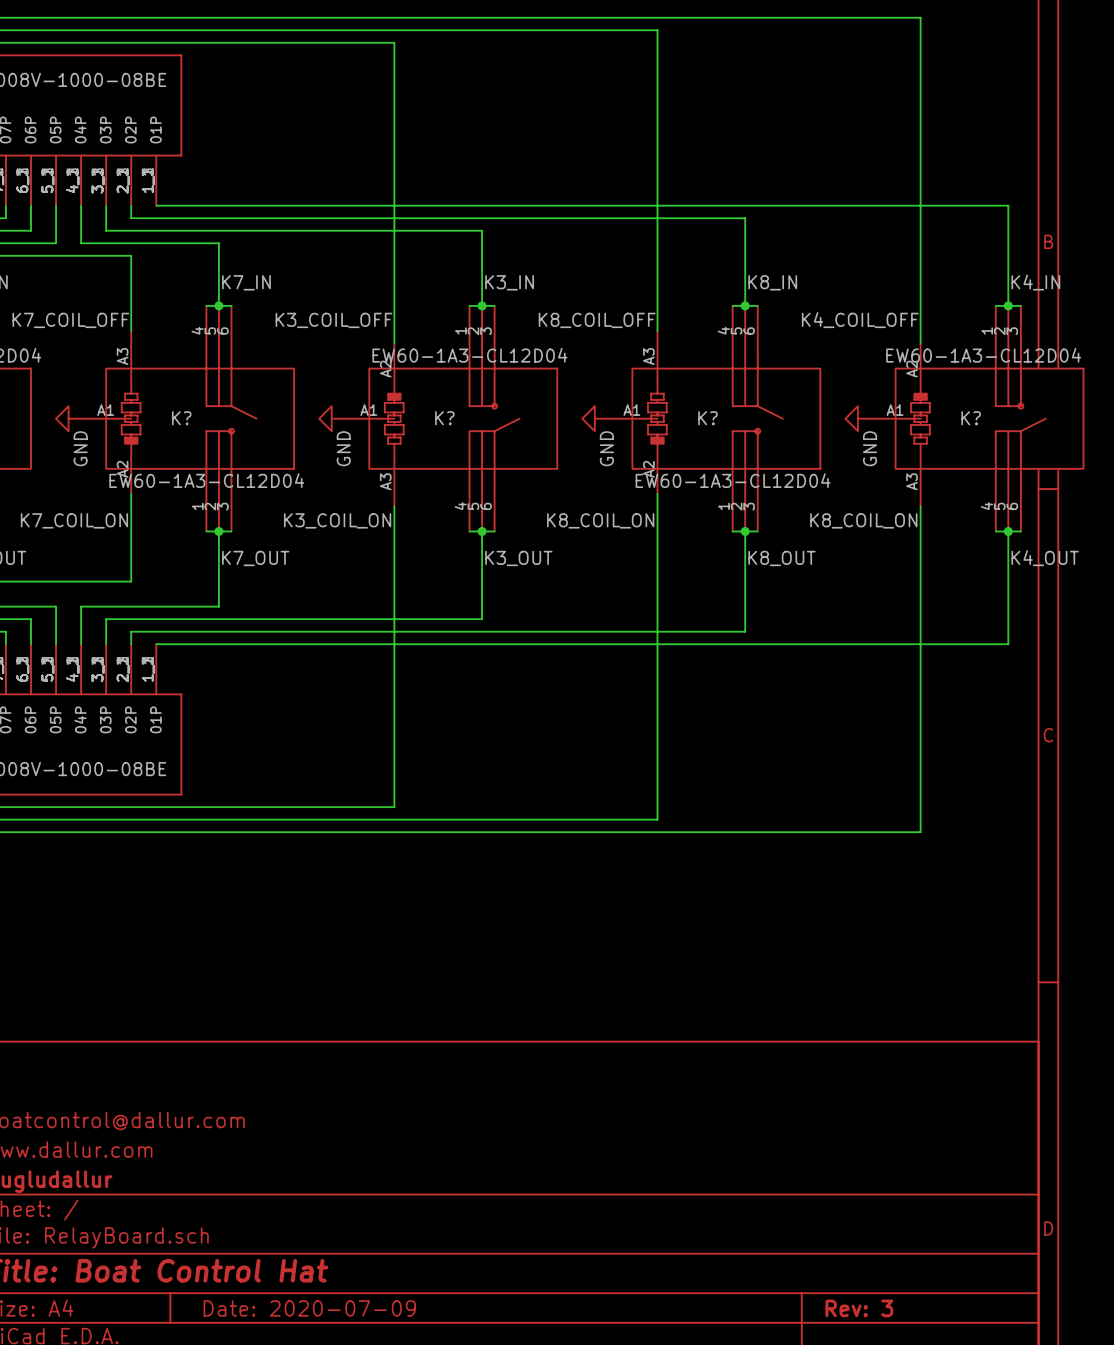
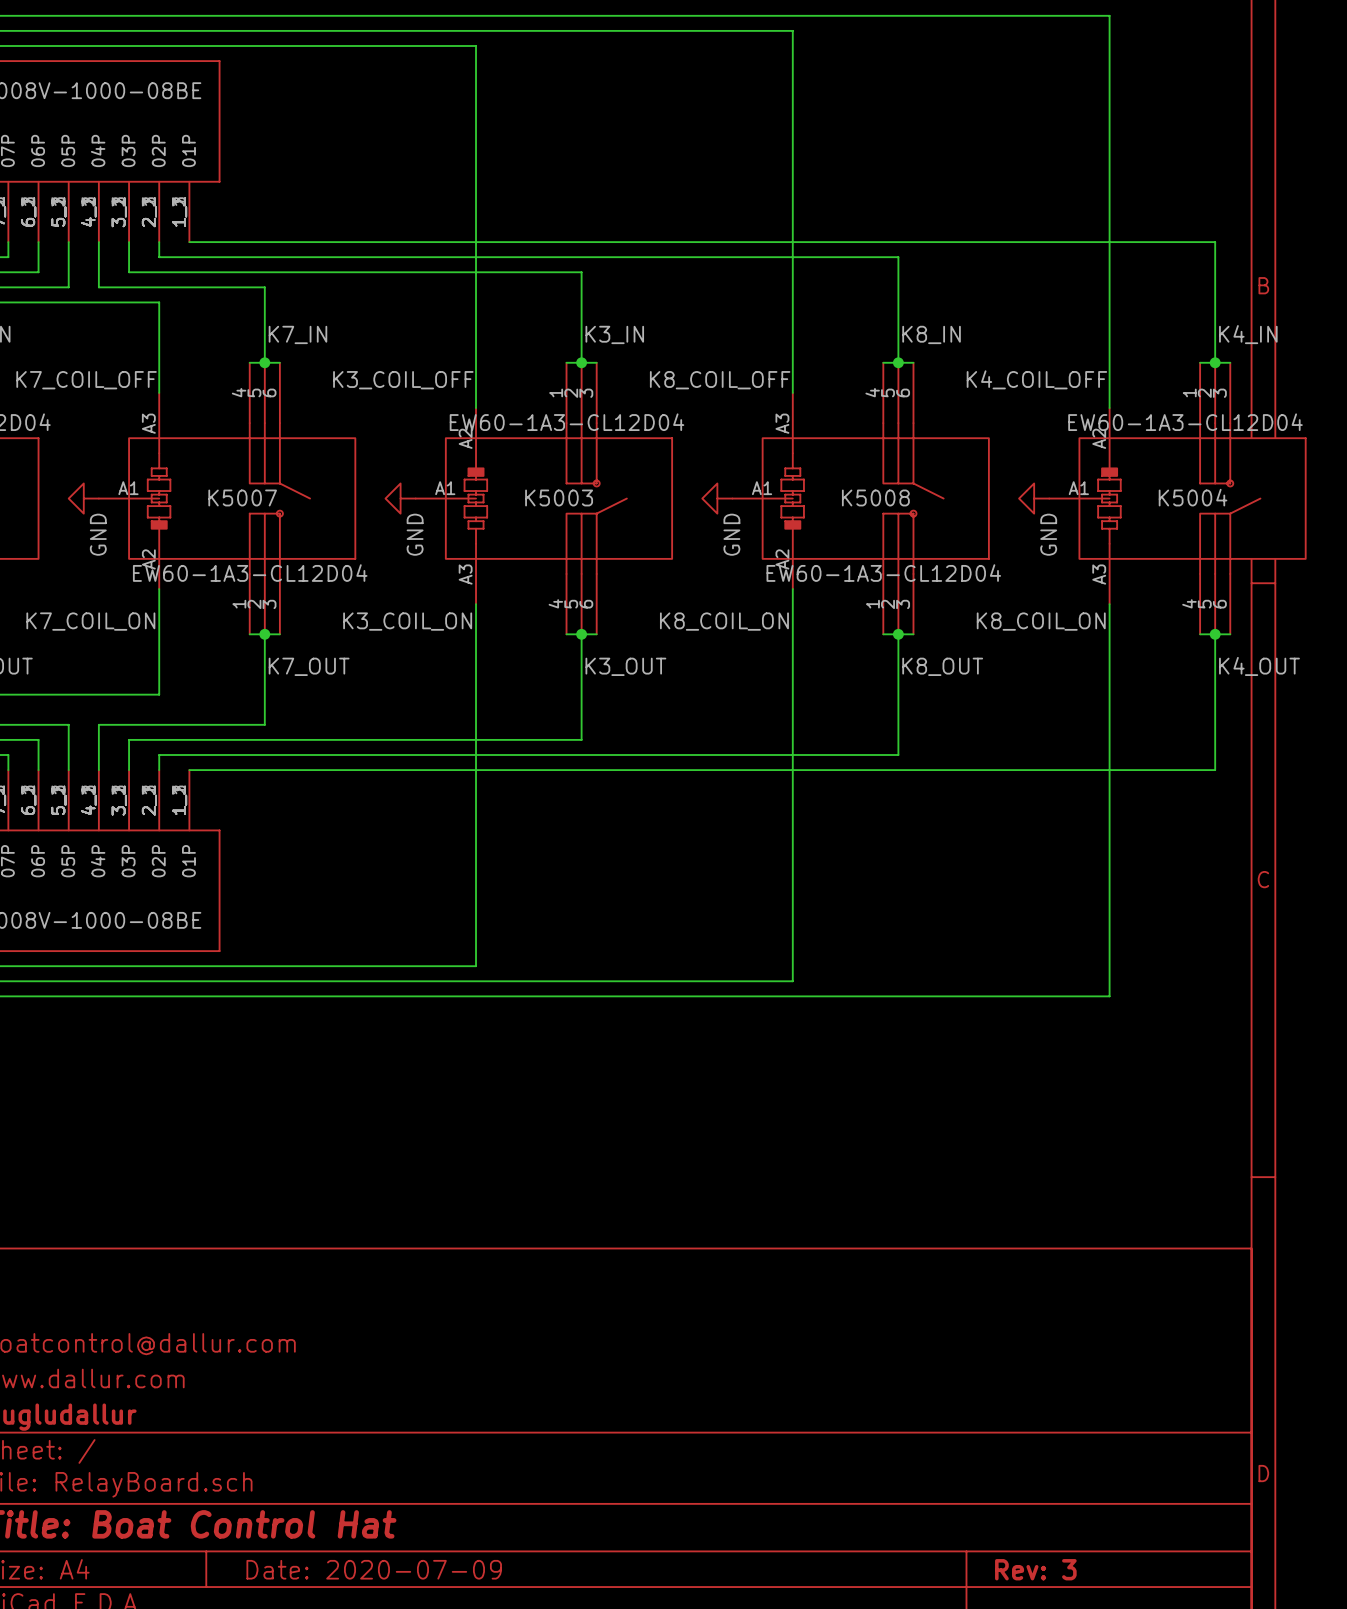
K? name: K? (181, 418) -> K5007 (242, 497)
K? name: K? (444, 418) -> K5003 (559, 497)
K? name: K? (708, 418) -> K5008 (875, 497)
K? name: K? (971, 418) -> K5004 (1193, 497)

